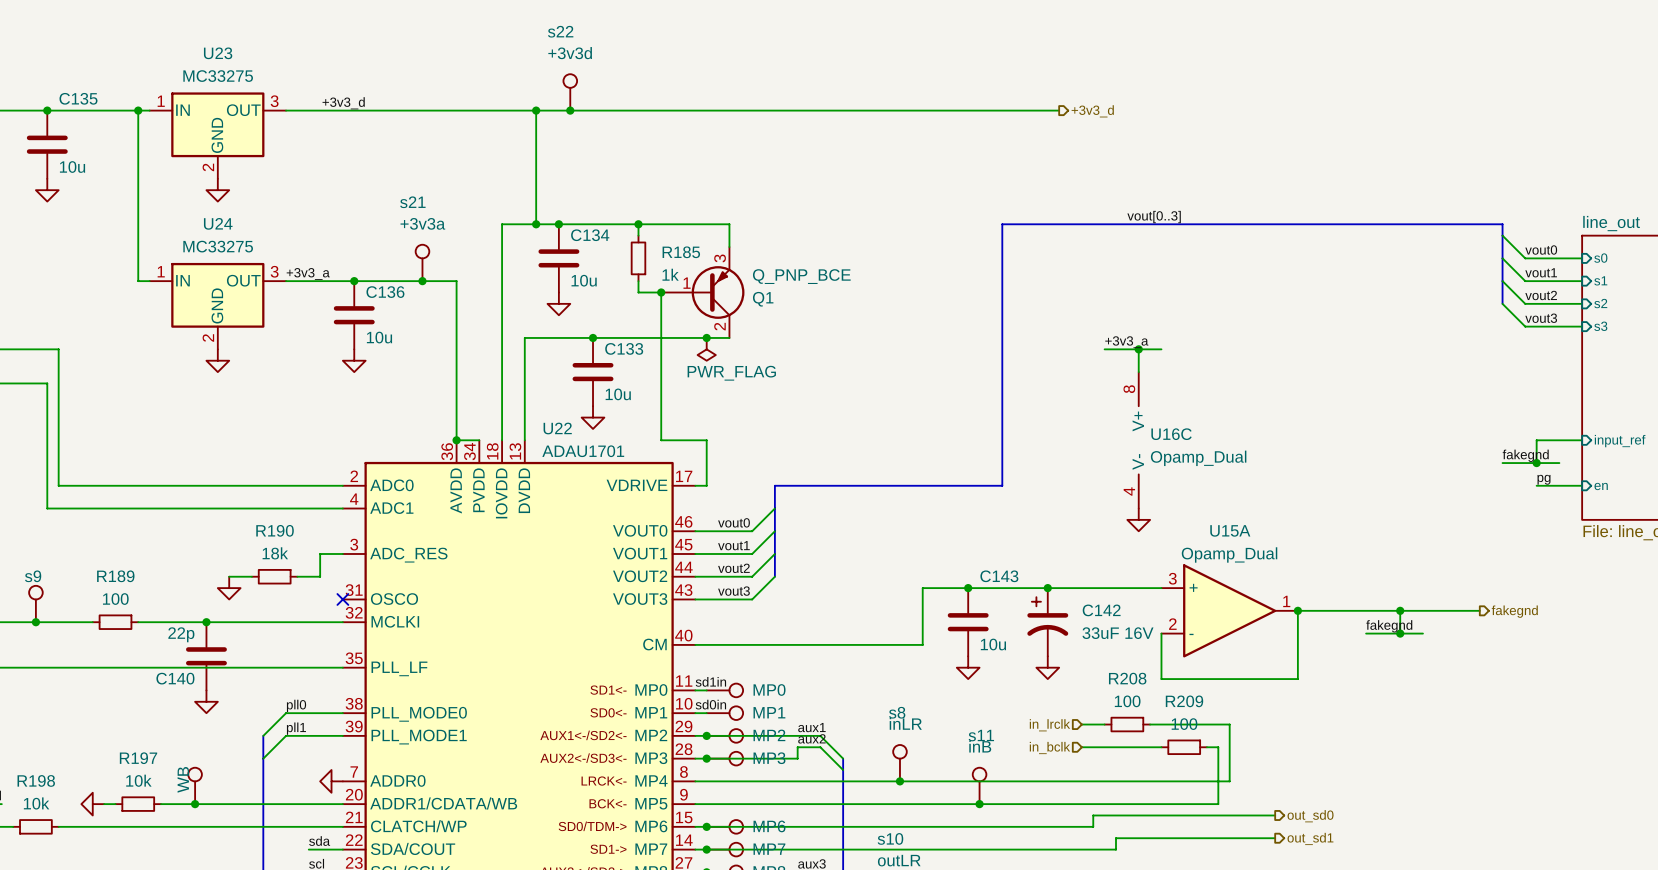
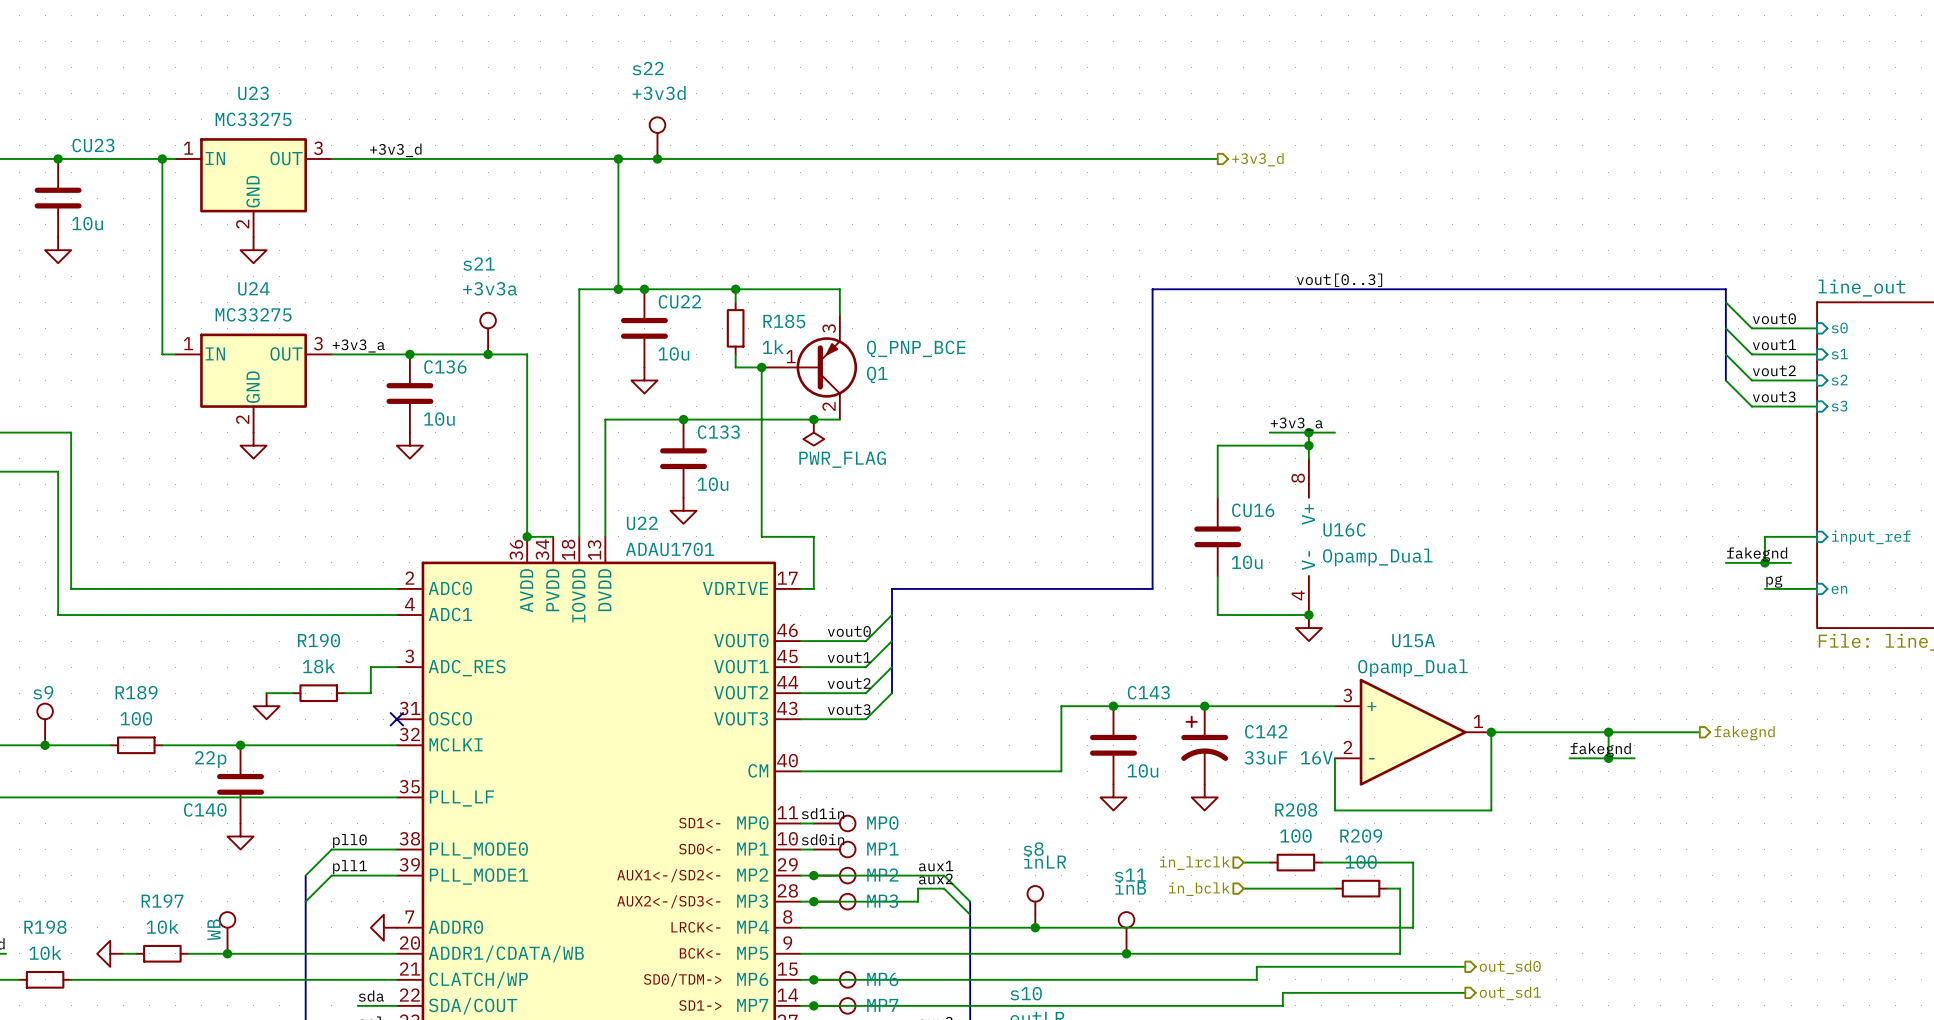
C135 name: C135 (78, 98) -> CU23 (93, 145)
C134 name: C134 (590, 235) -> CU22 (679, 301)
wire: none -> (1308, 445) (1217, 445) (1217, 497)
junction: none -> (1308, 445)
CU16: none -> 10u (1217, 536)
wire: none -> (1217, 575) (1217, 615) (1308, 615)
junction: none -> (1308, 615)

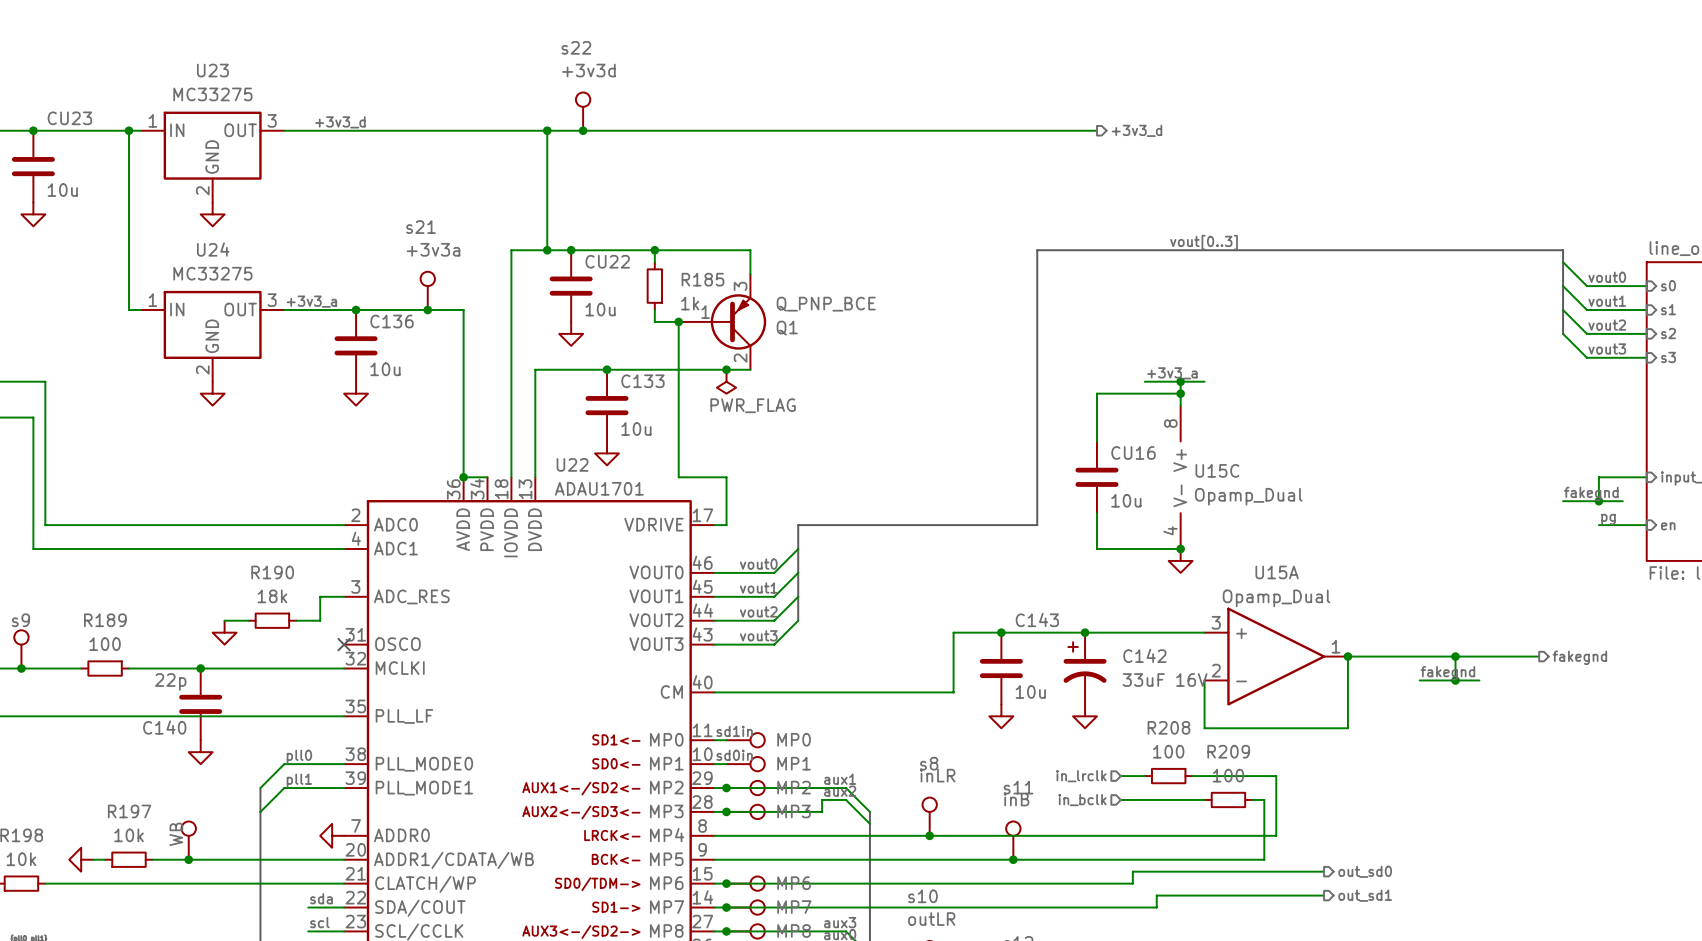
U16C name: U16C (1344, 529) -> U15C (1217, 470)

